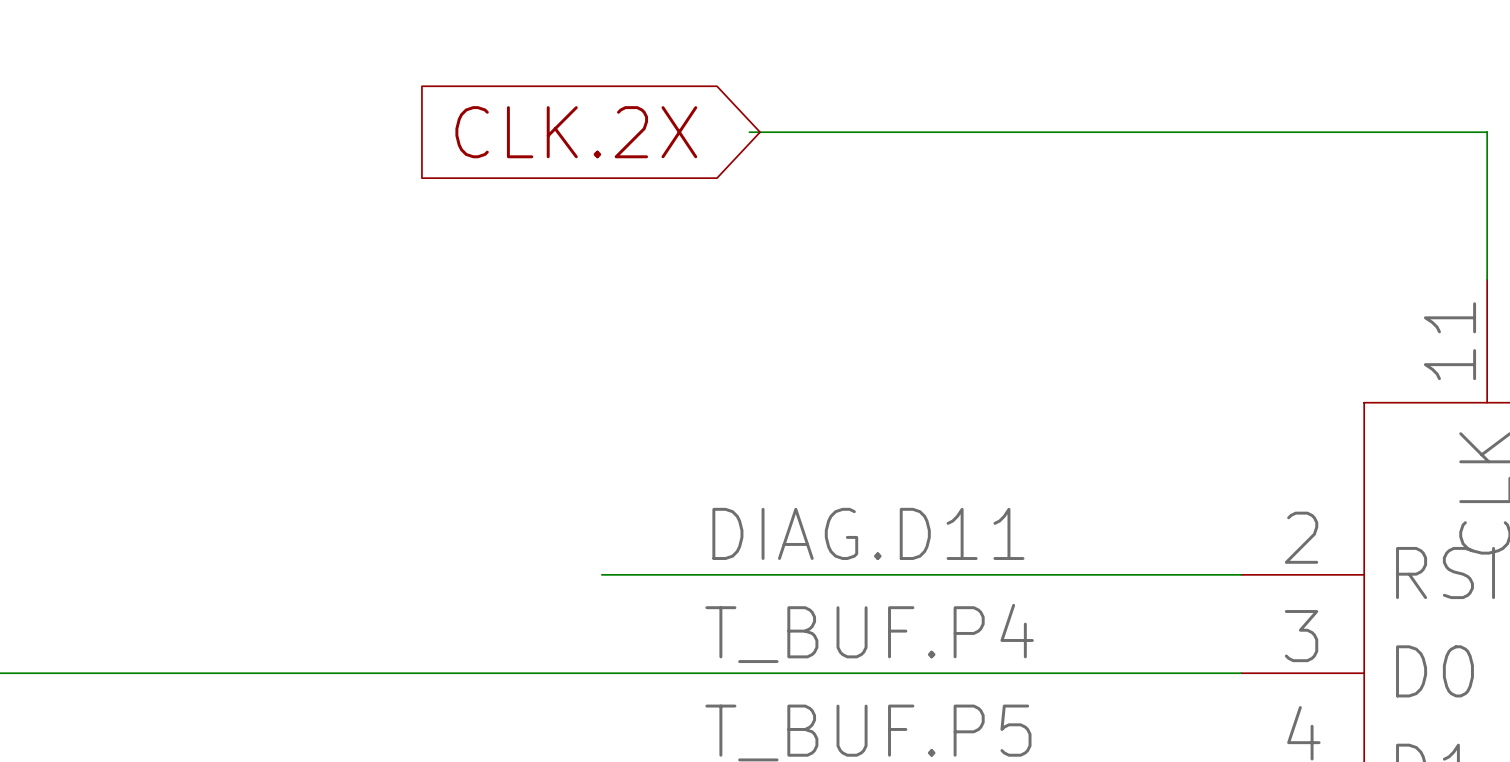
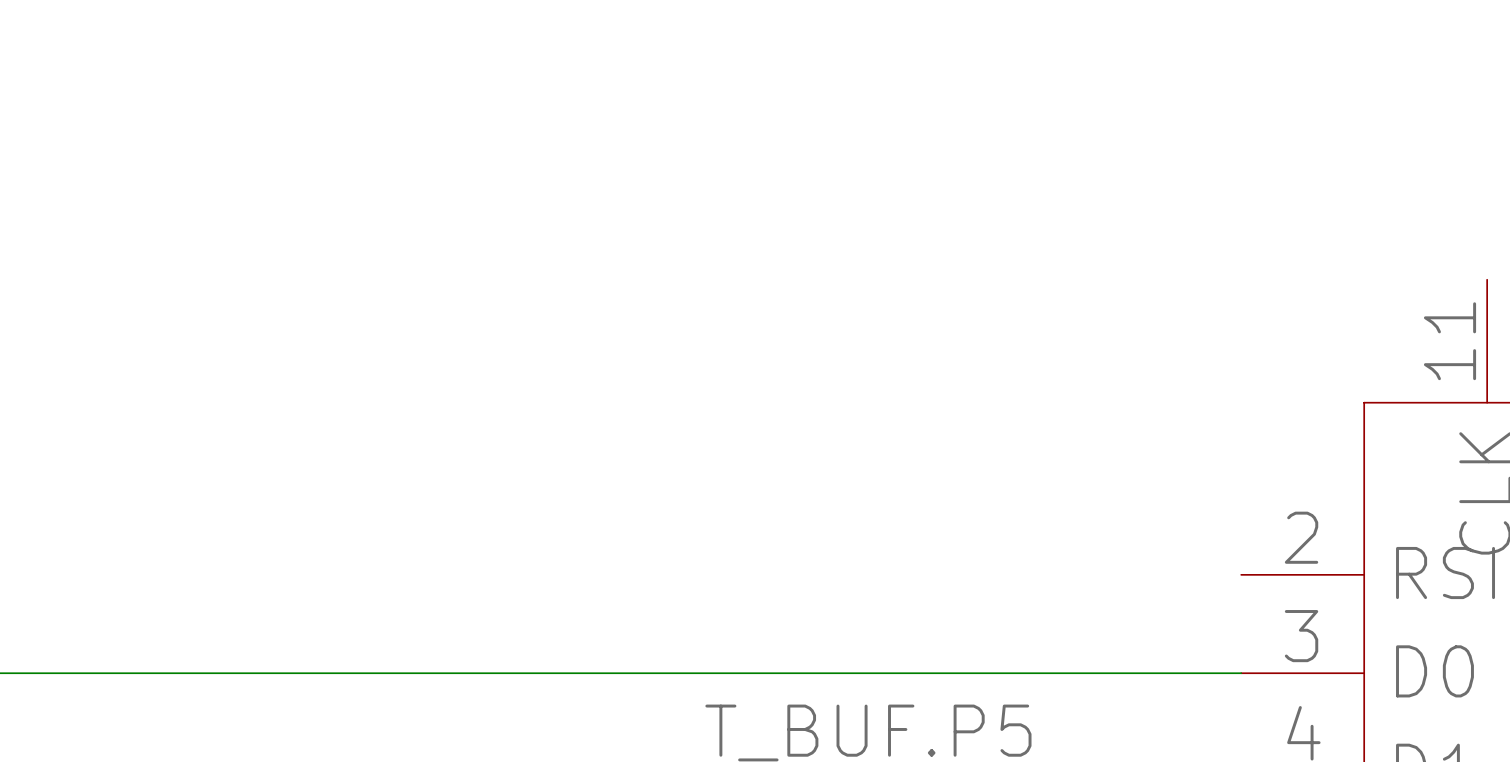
global label: CLK.2X (576, 132) -> none
wire: (749, 132) (1487, 132) (1487, 279) -> none
label: DIAG.D11 (868, 533) -> none
wire: (601, 574) (1241, 574) -> none
label: T_BUF.P4 (869, 633) -> none

